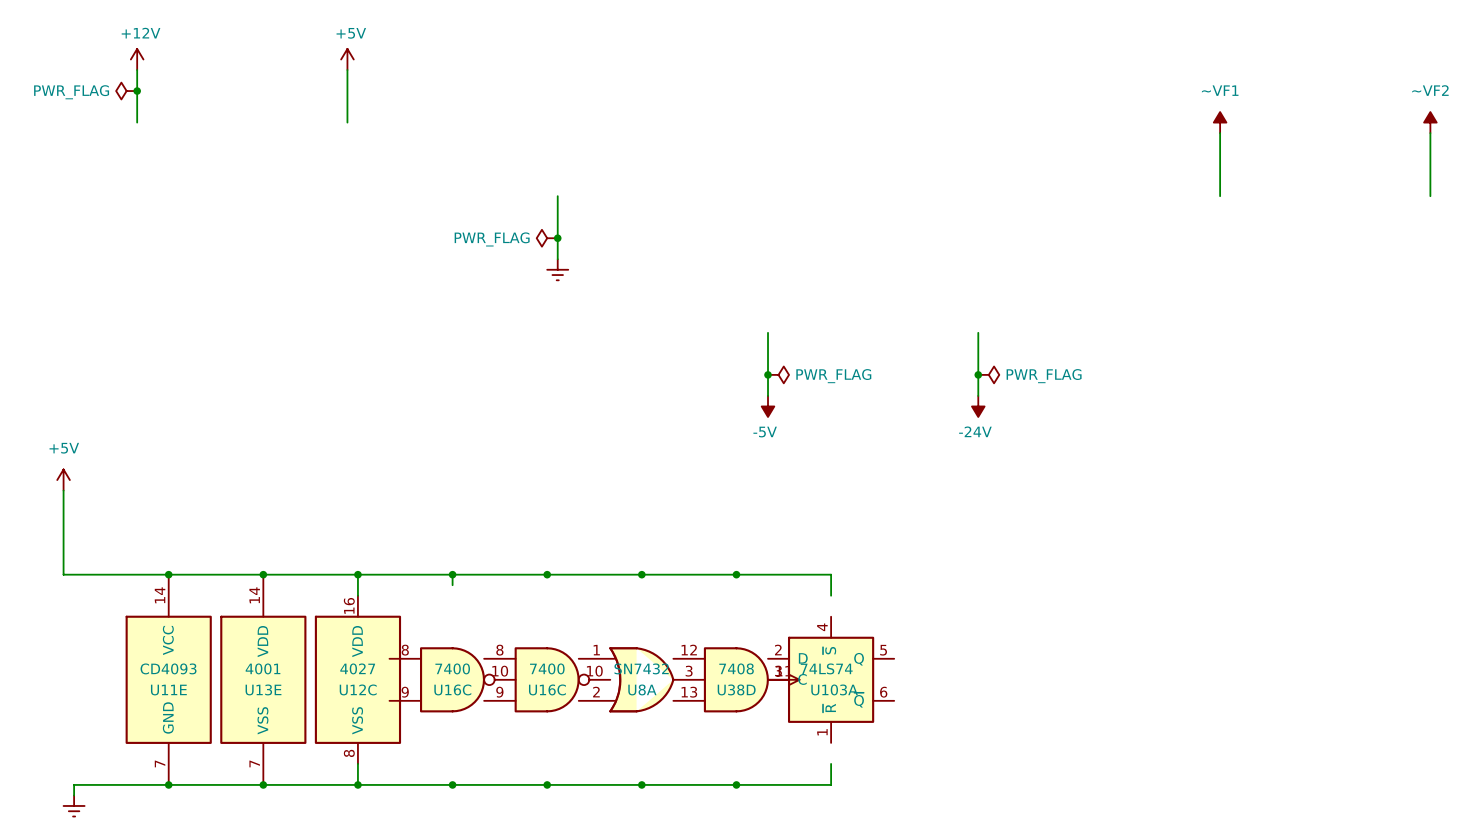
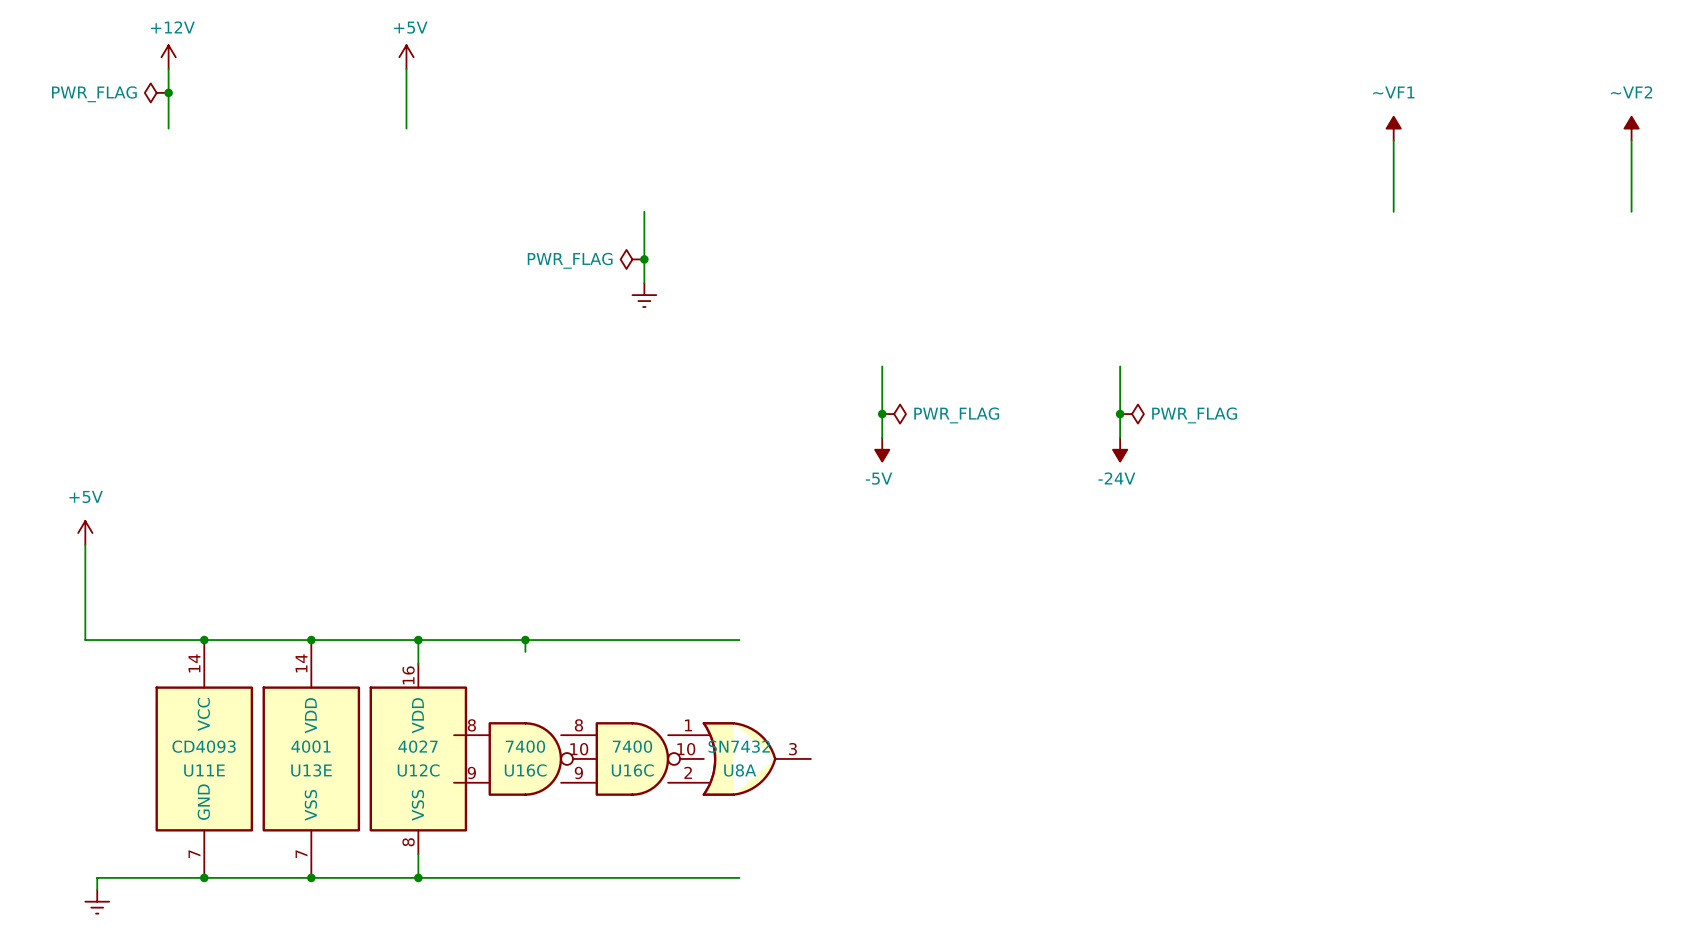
junction: (547, 574) -> none
wire: (641, 574) (831, 574) (831, 595) -> none
junction: (641, 574) -> none
junction: (736, 574) -> none
U38D: 7408 (736, 679) -> none
U103A: 74LS74 (831, 679) -> none
wire: (831, 763) (831, 784) (641, 784) -> none
junction: (452, 784) -> none
junction: (547, 784) -> none
junction: (641, 784) -> none
junction: (736, 784) -> none

